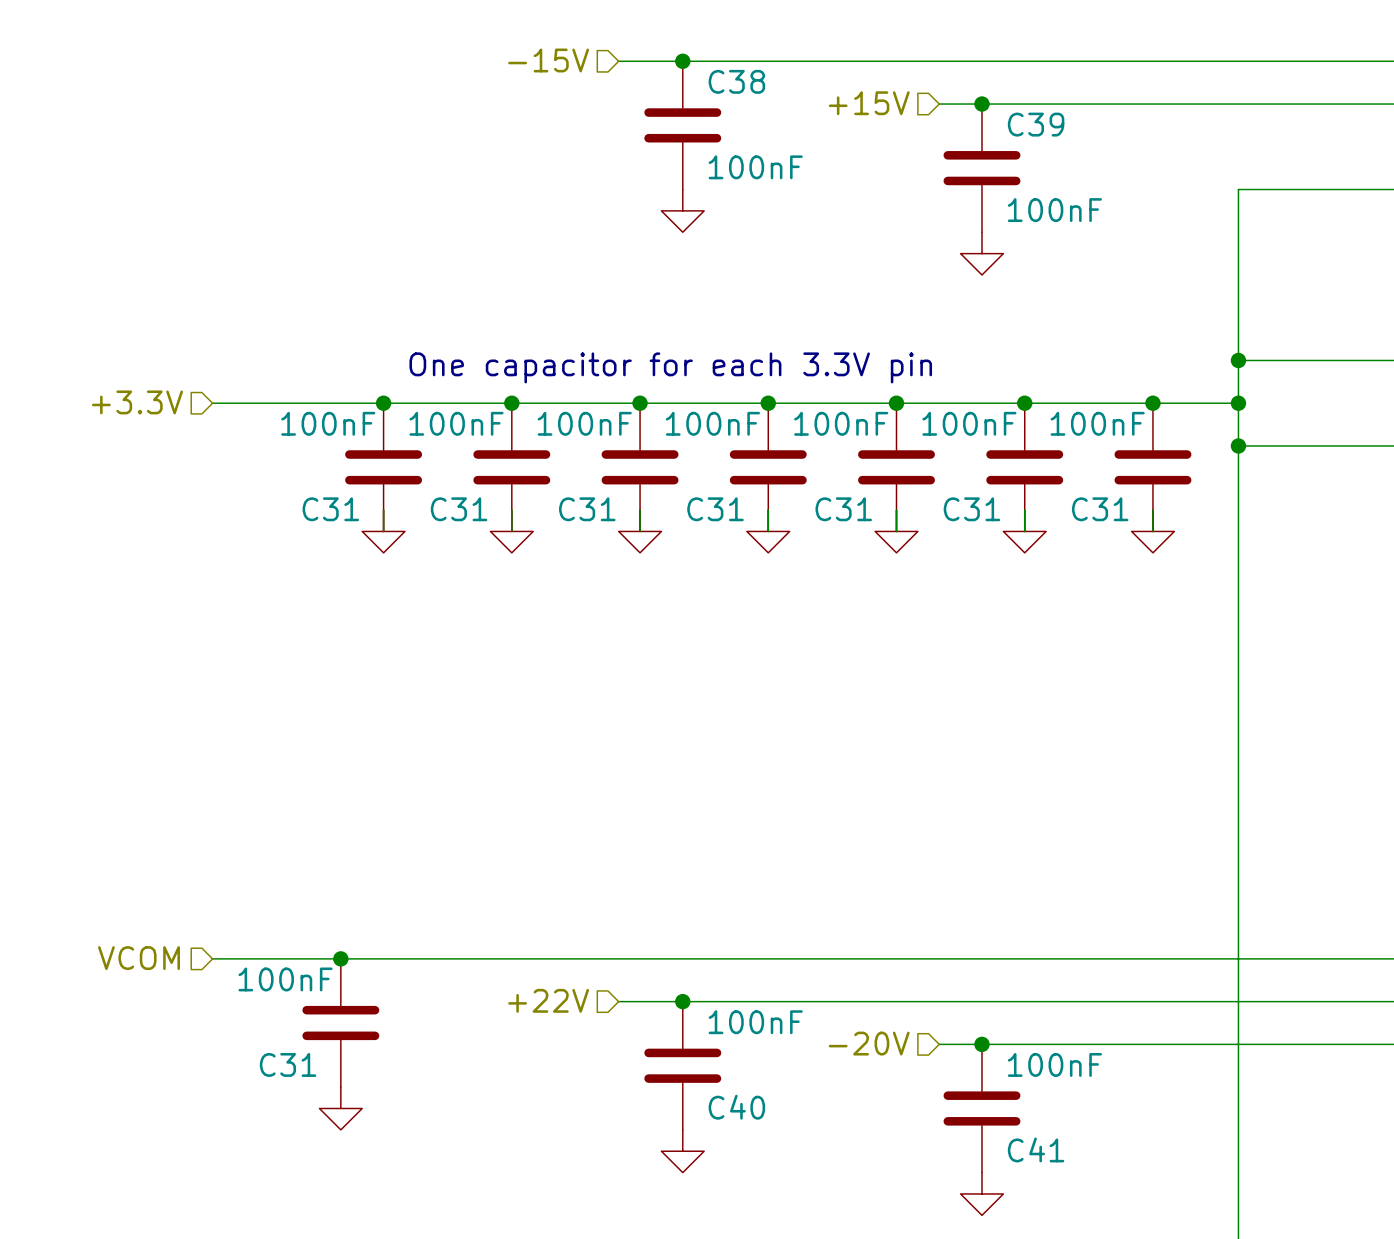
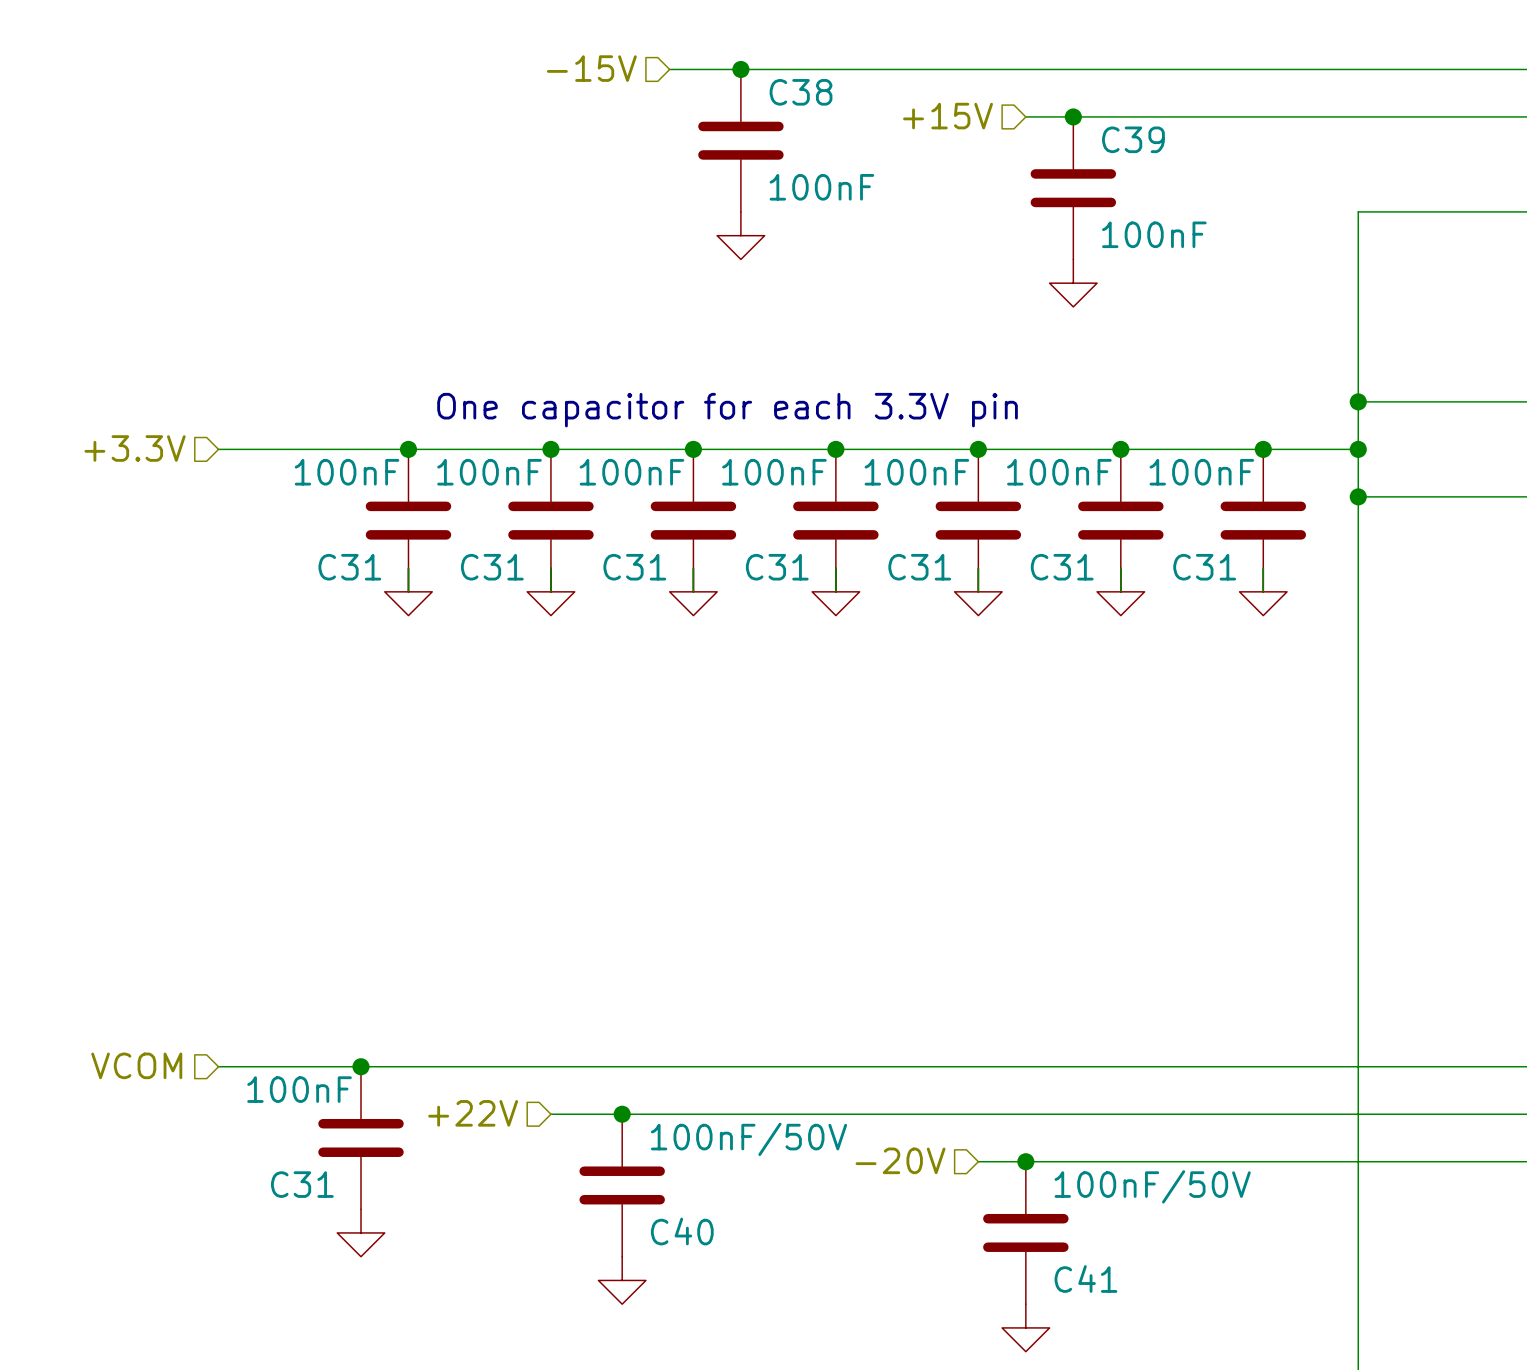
hierarchical label position: +22V (548, 1000) -> +22V (473, 1113)
wire: none -> (550, 1114) (669, 1114)
junction: none -> (622, 1114)
junction: (682, 1001) -> none
C40 value: 100nF (755, 1022) -> 100nF/50V (749, 1139)
hierarchical label position: -20V (869, 1043) -> -20V (900, 1160)
wire: none -> (978, 1161) (1025, 1161)
junction position: (981, 1044) -> (1025, 1161)
C41 value: 100nF (1054, 1064) -> 100nF/50V (1152, 1186)
C40 position: (682, 1065) -> (622, 1185)
C41 position: (981, 1108) -> (1025, 1232)
power symbol position: (682, 1151) -> (622, 1280)
power symbol position: (981, 1193) -> (1025, 1327)

